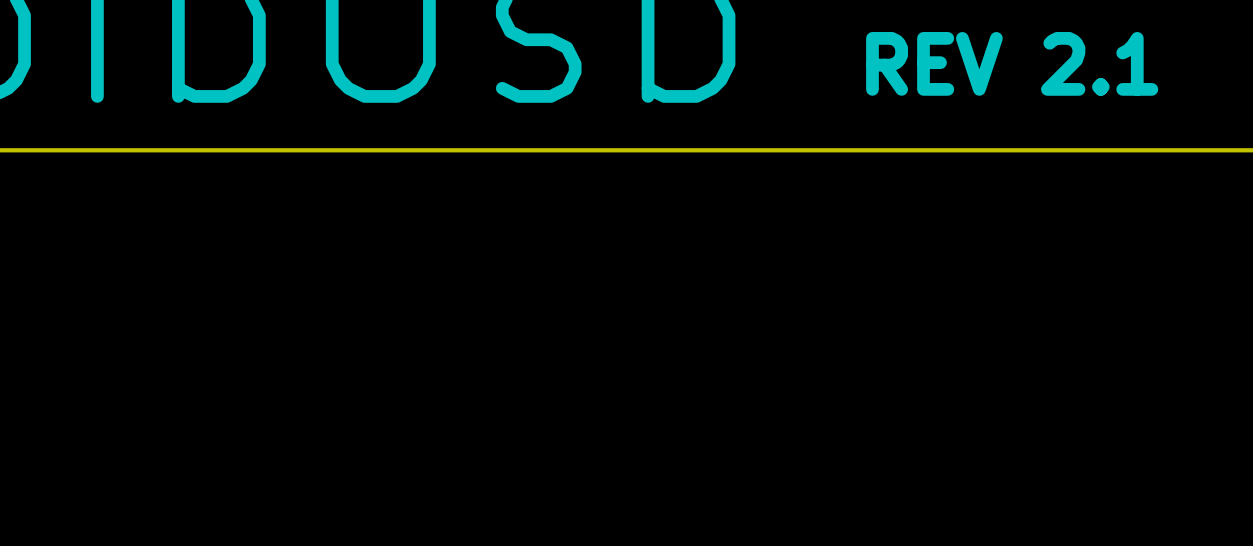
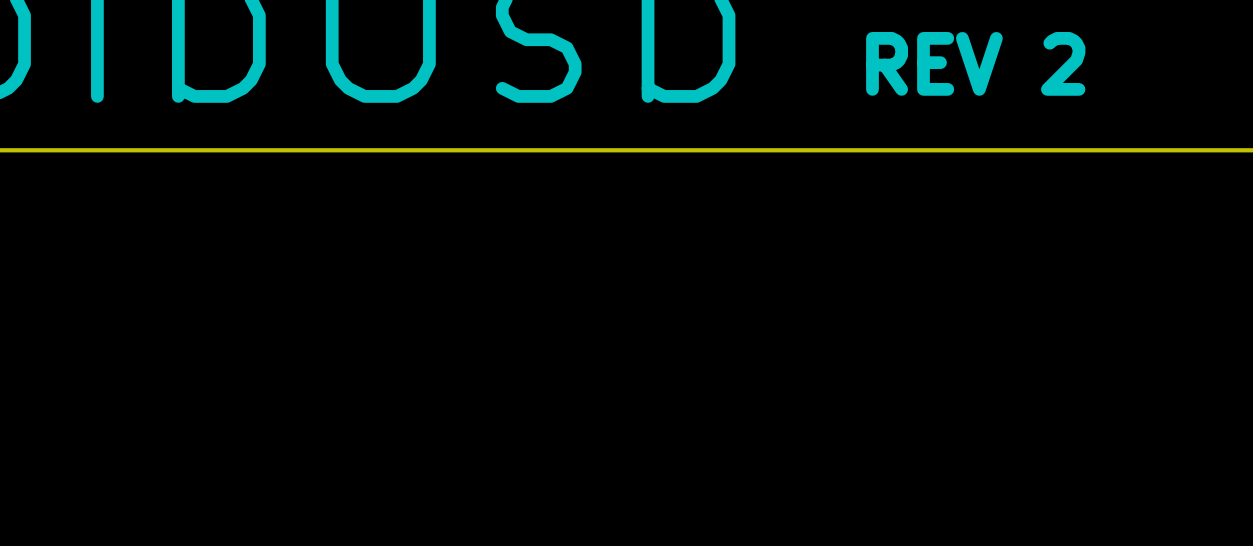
text: REV 2.1 (1012, 63) -> REV 2 (975, 63)

